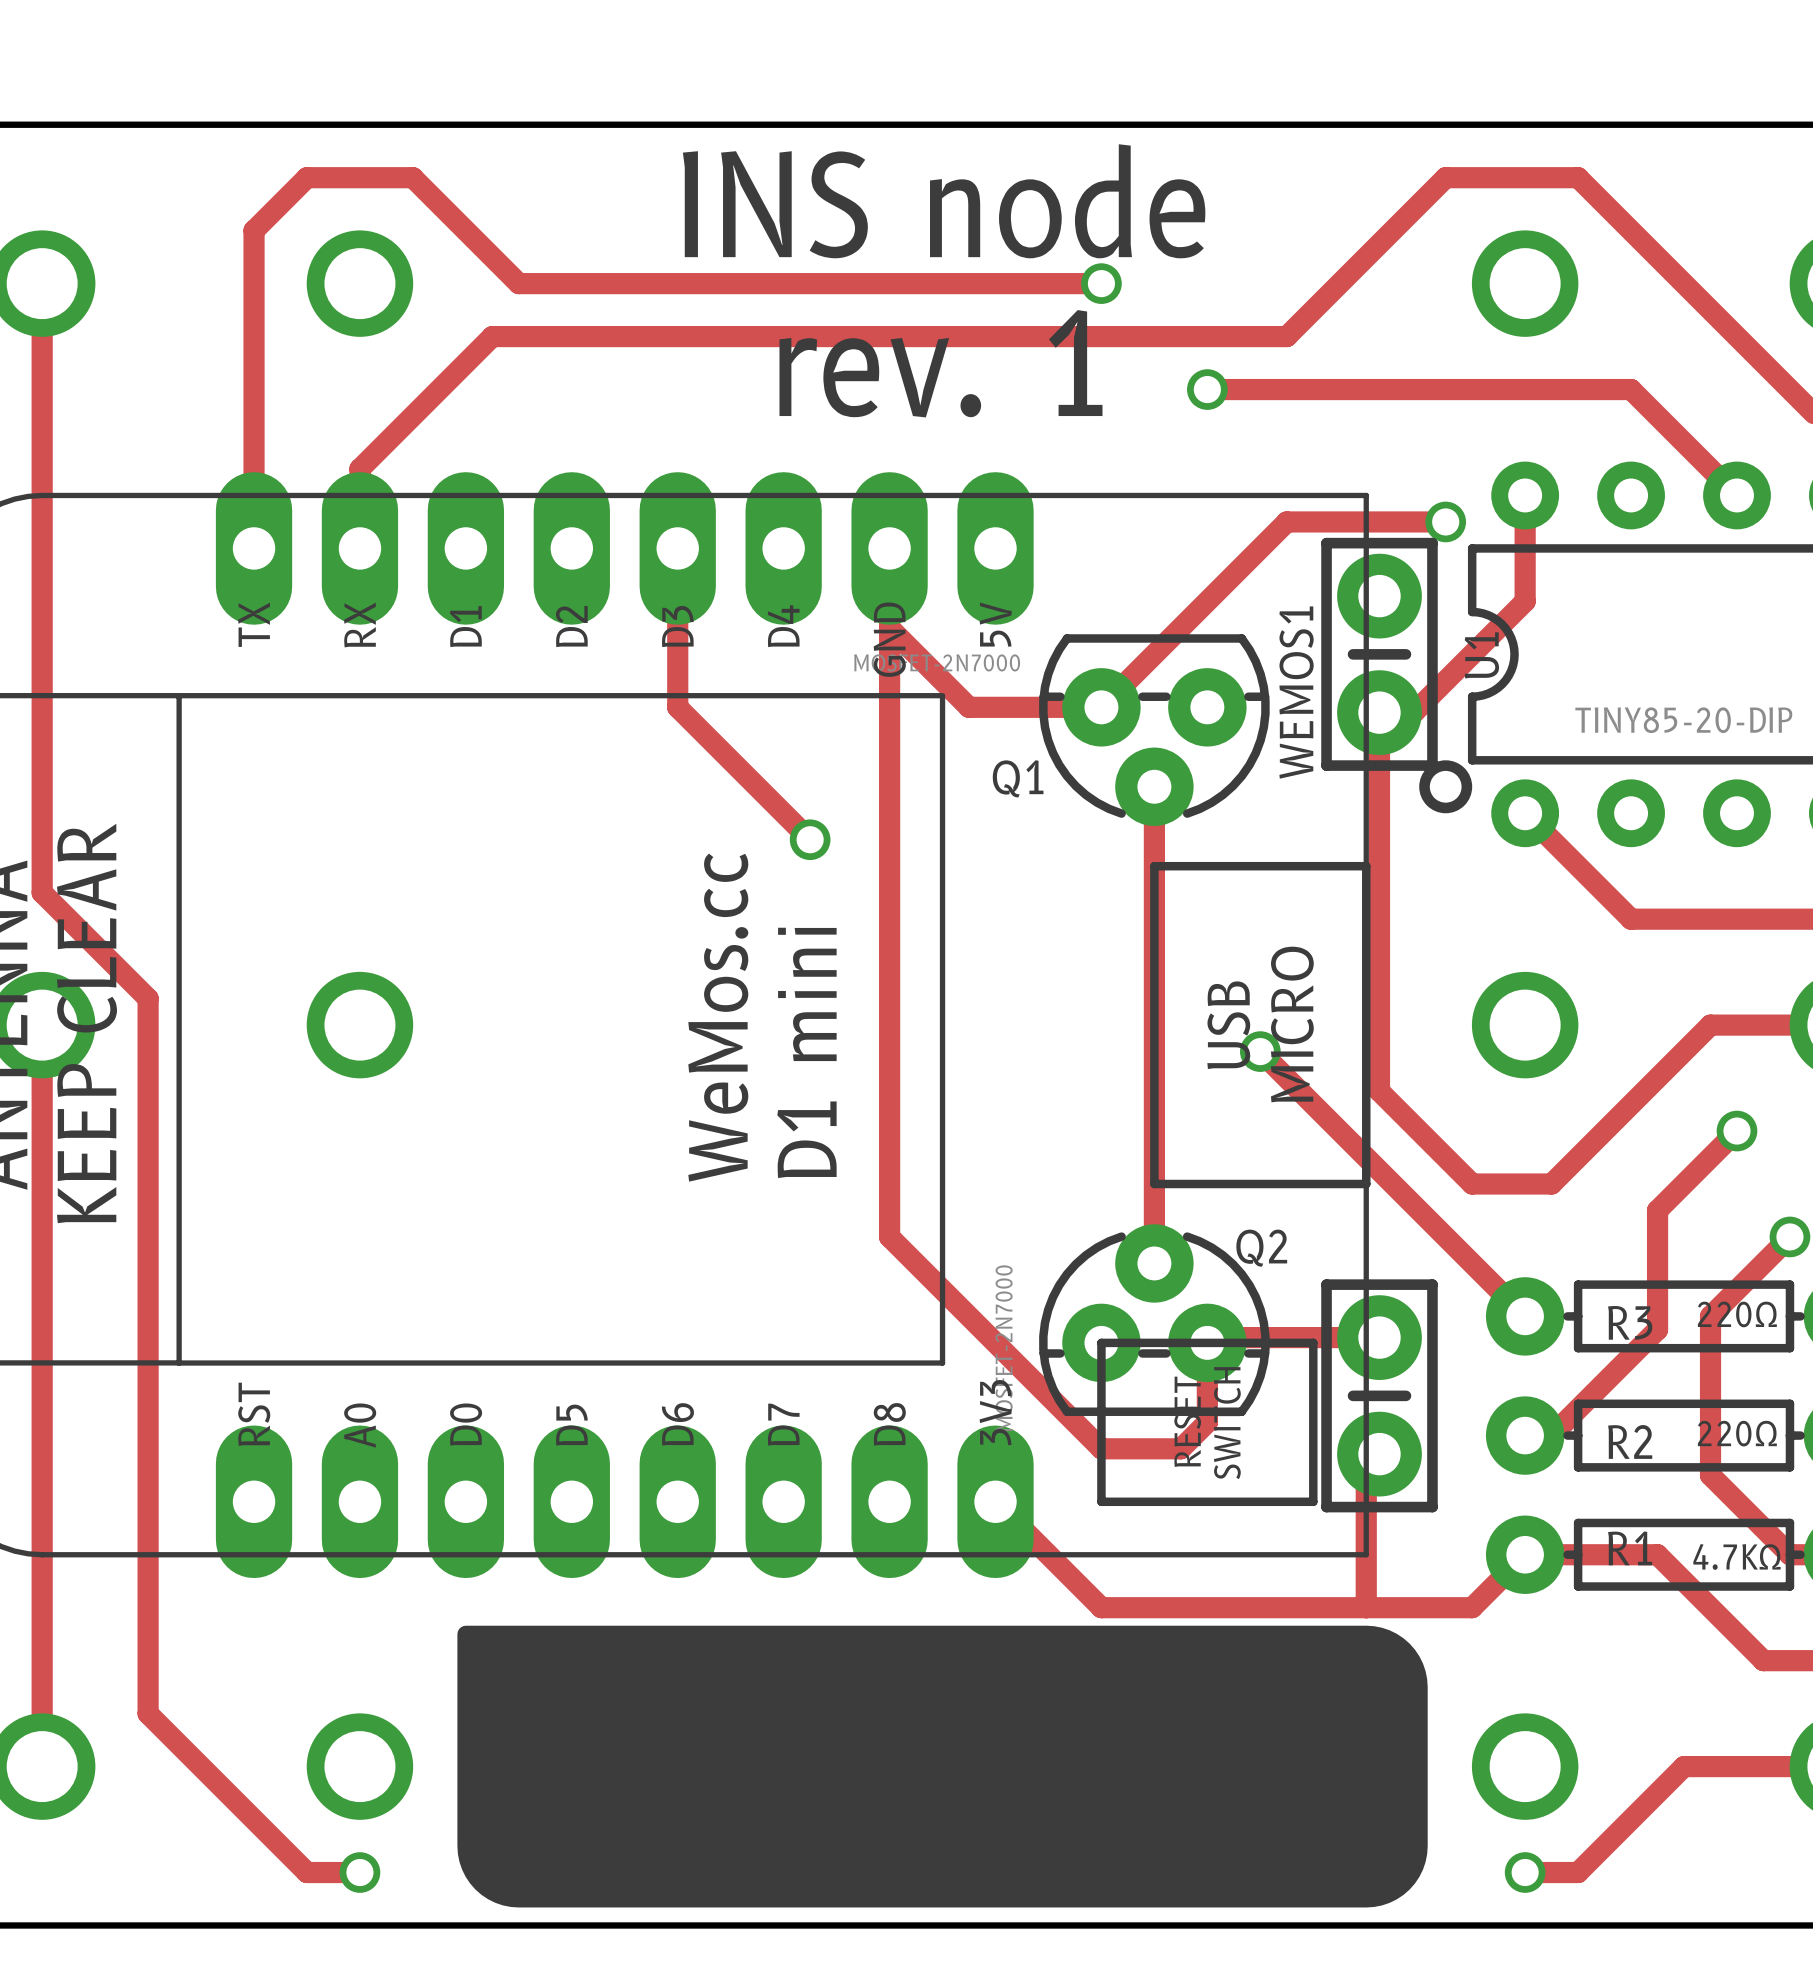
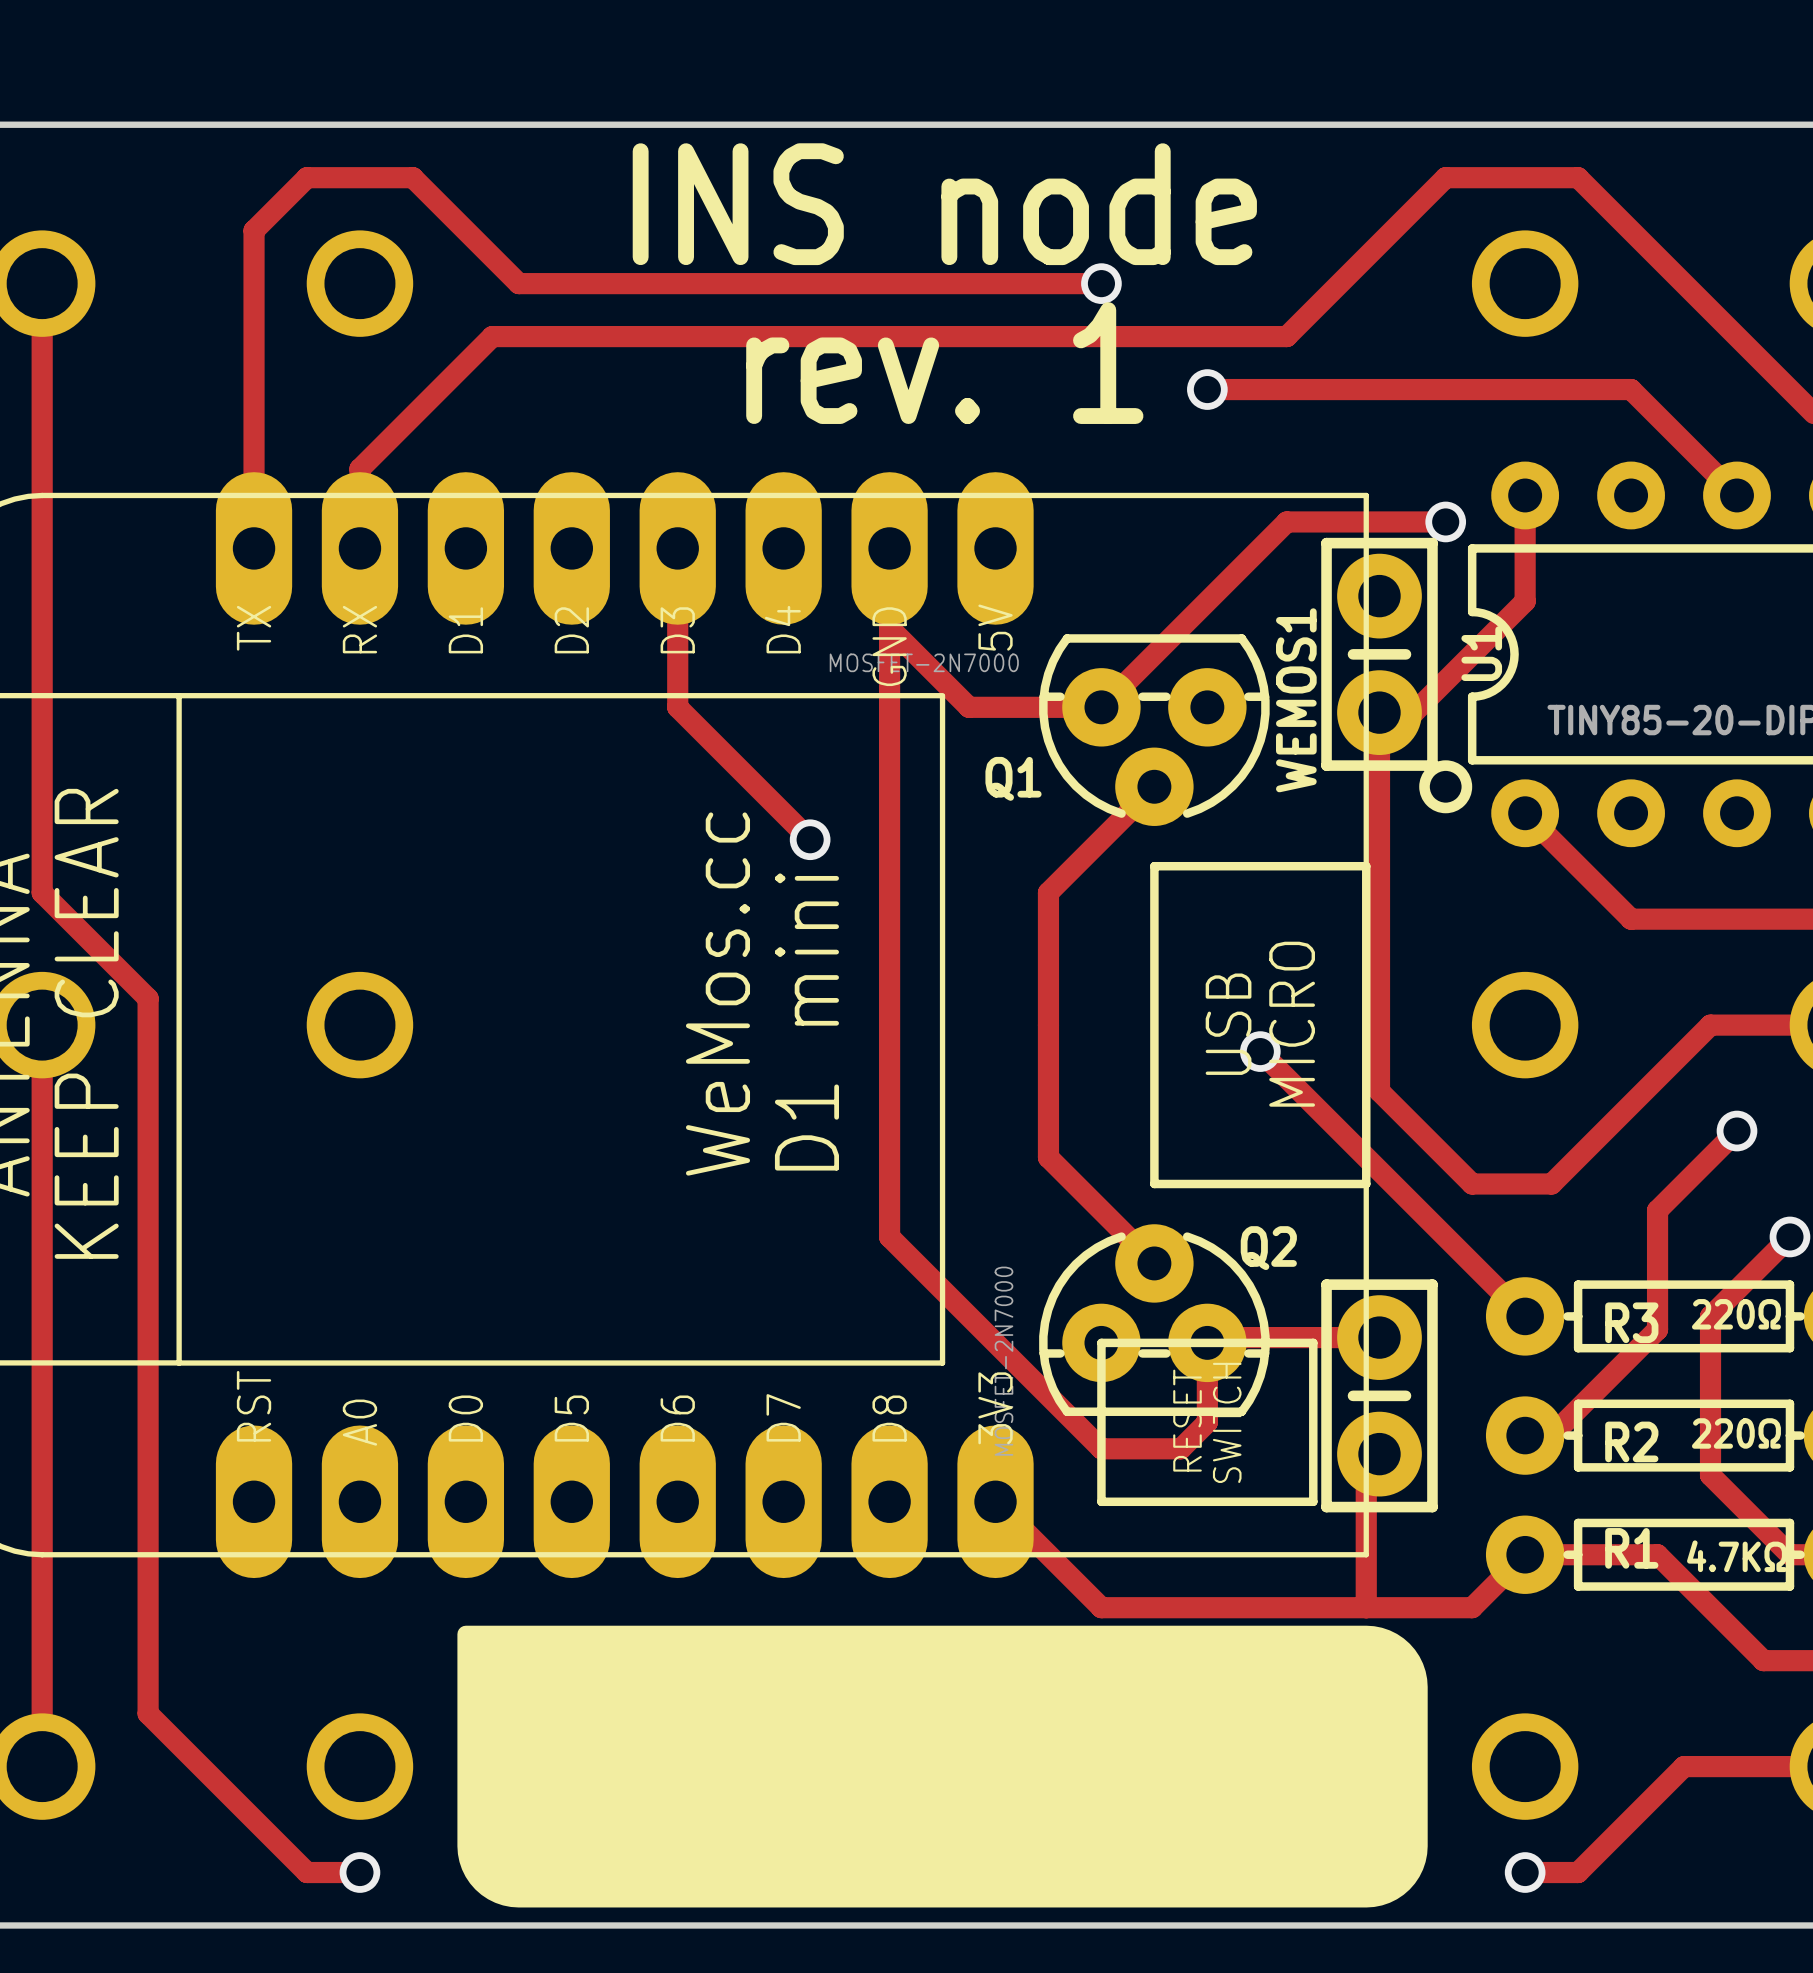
track: (1154, 786) (1154, 1263) -> (1154, 786) (1048, 892) (1048, 1157) (1154, 1263)

